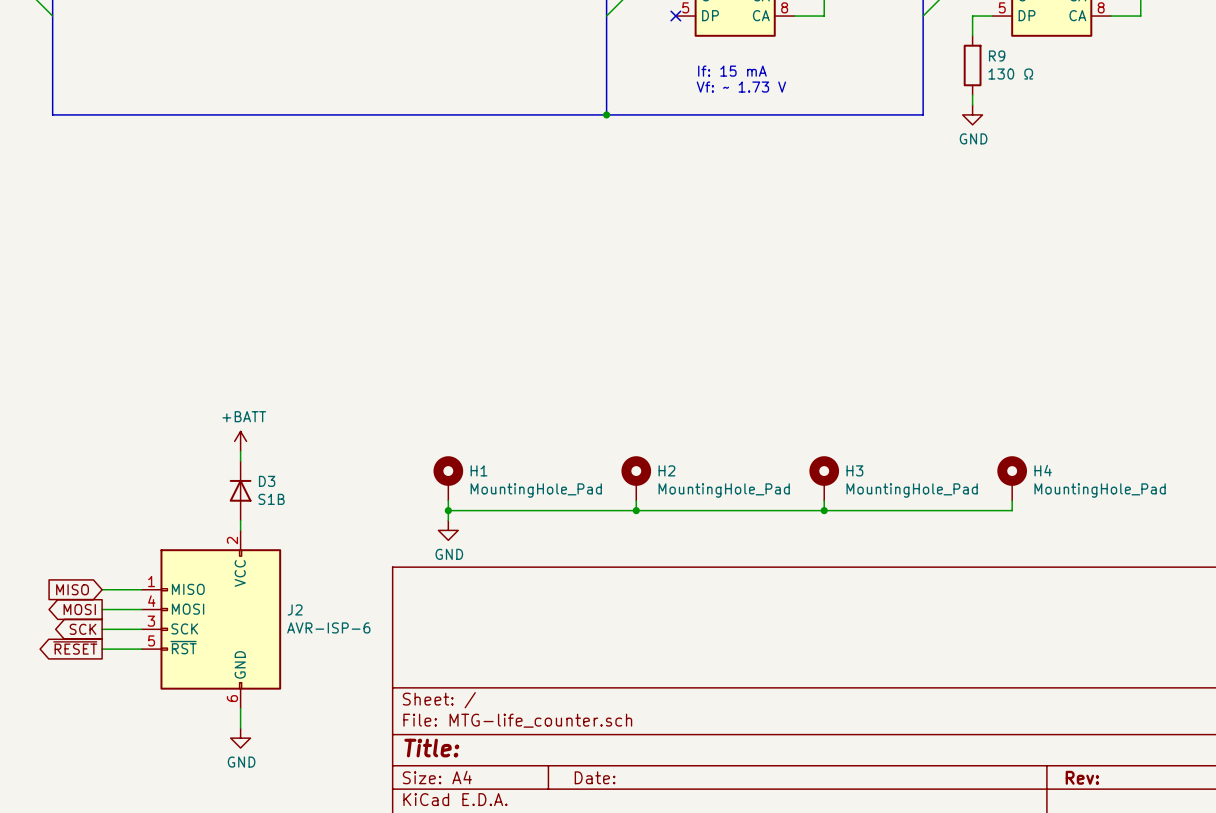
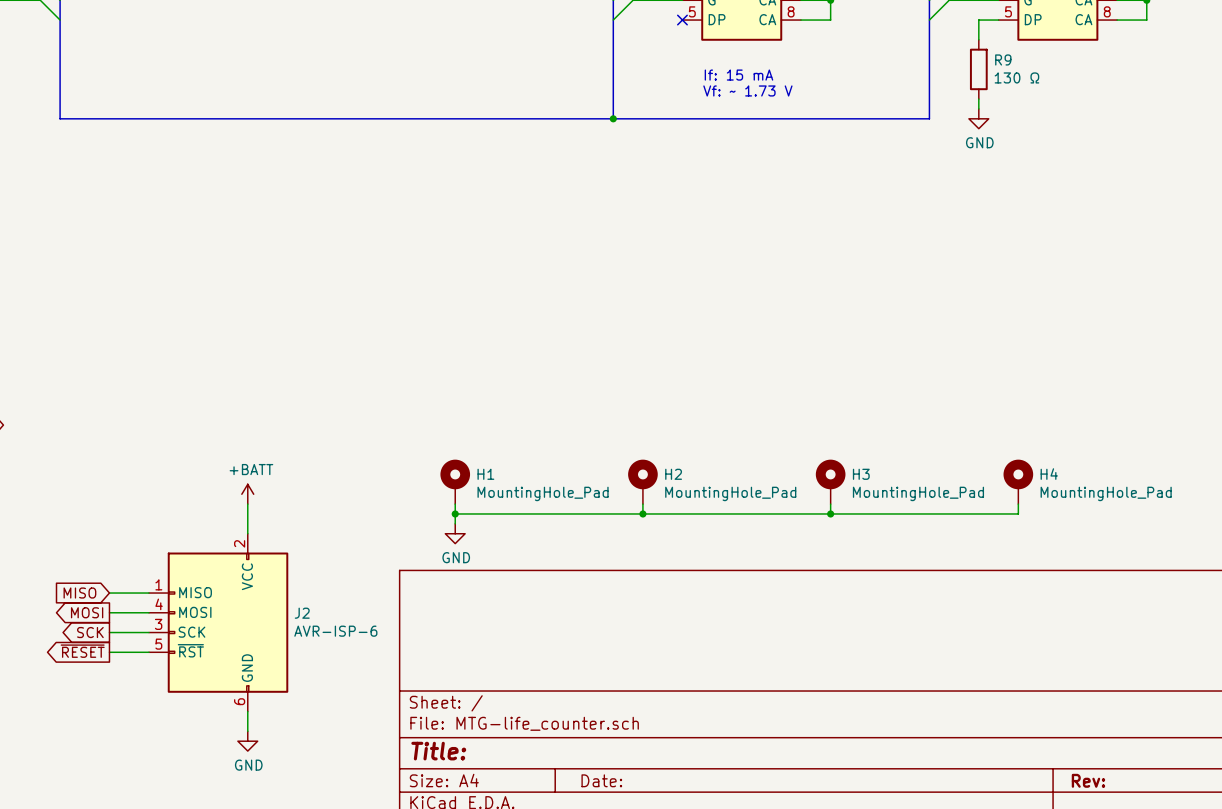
power symbol position: +BATT (240, 441) -> +BATT (247, 494)
wire: (240, 451) (240, 461) -> none
D3: S1B (240, 490) -> none

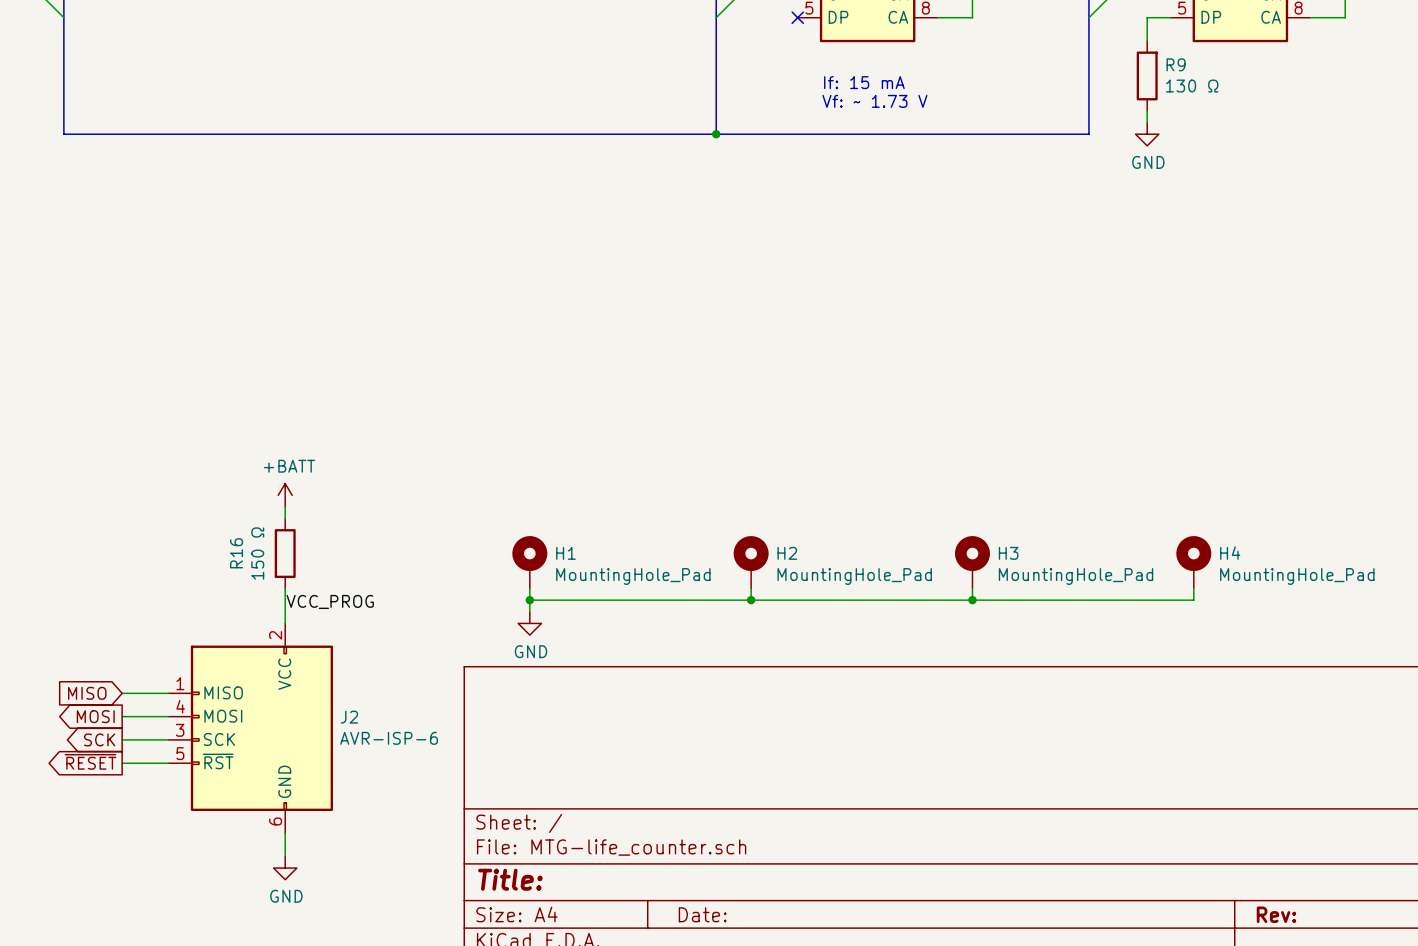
wire: none -> (285, 506) (285, 518)
R16: none -> 150 Ω (285, 553)
power symbol position: +BATT (247, 494) -> +BATT (285, 495)
label: none -> VCC_PROG (330, 601)

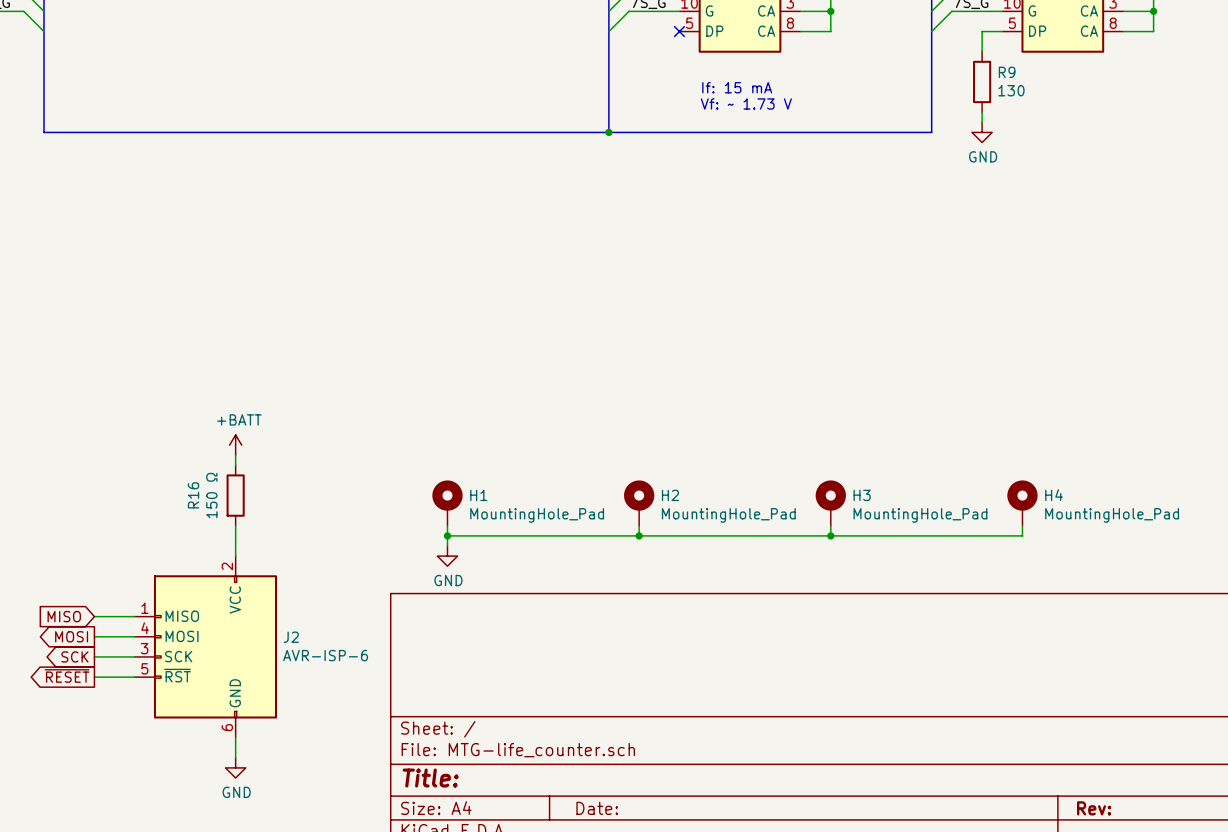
R9 value: 130 Ω (1192, 86) -> 130 (1011, 90)
label: VCC_PROG (330, 601) -> none

